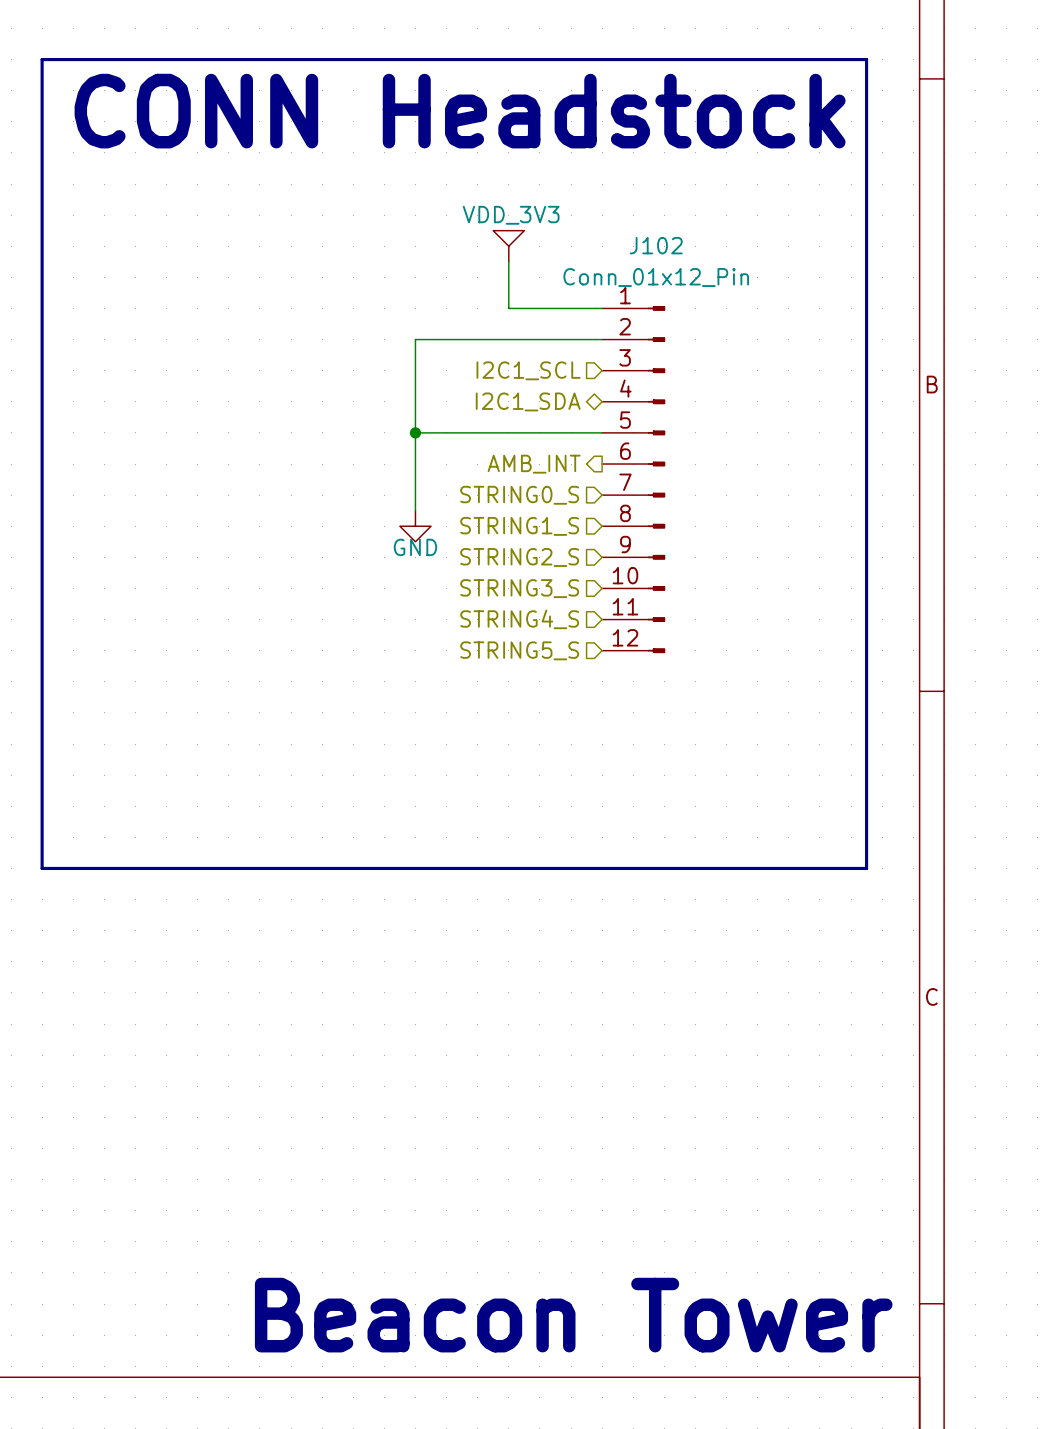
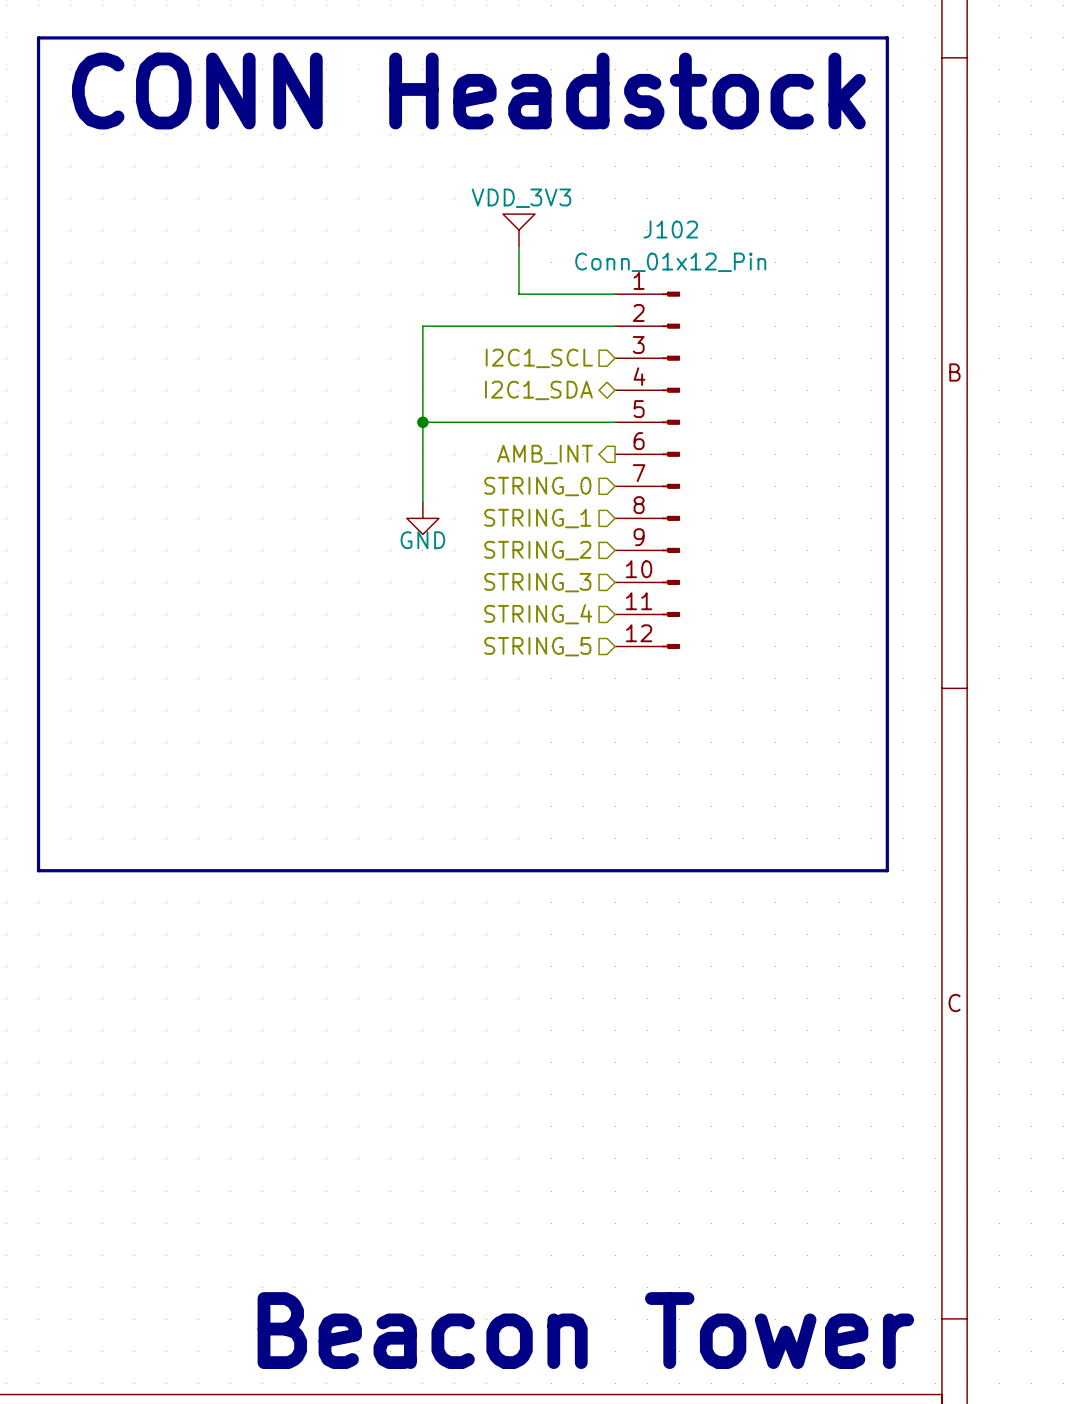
hierarchical label: STRING0_S (519, 495) -> STRING_0 (537, 486)
hierarchical label: STRING1_S (519, 526) -> STRING_1 (537, 518)
hierarchical label: STRING2_S (519, 557) -> STRING_2 (537, 550)
hierarchical label: STRING3_S (519, 588) -> STRING_3 (537, 582)
hierarchical label: STRING4_S (519, 619) -> STRING_4 (538, 614)
hierarchical label: STRING5_S (519, 650) -> STRING_5 (537, 646)

